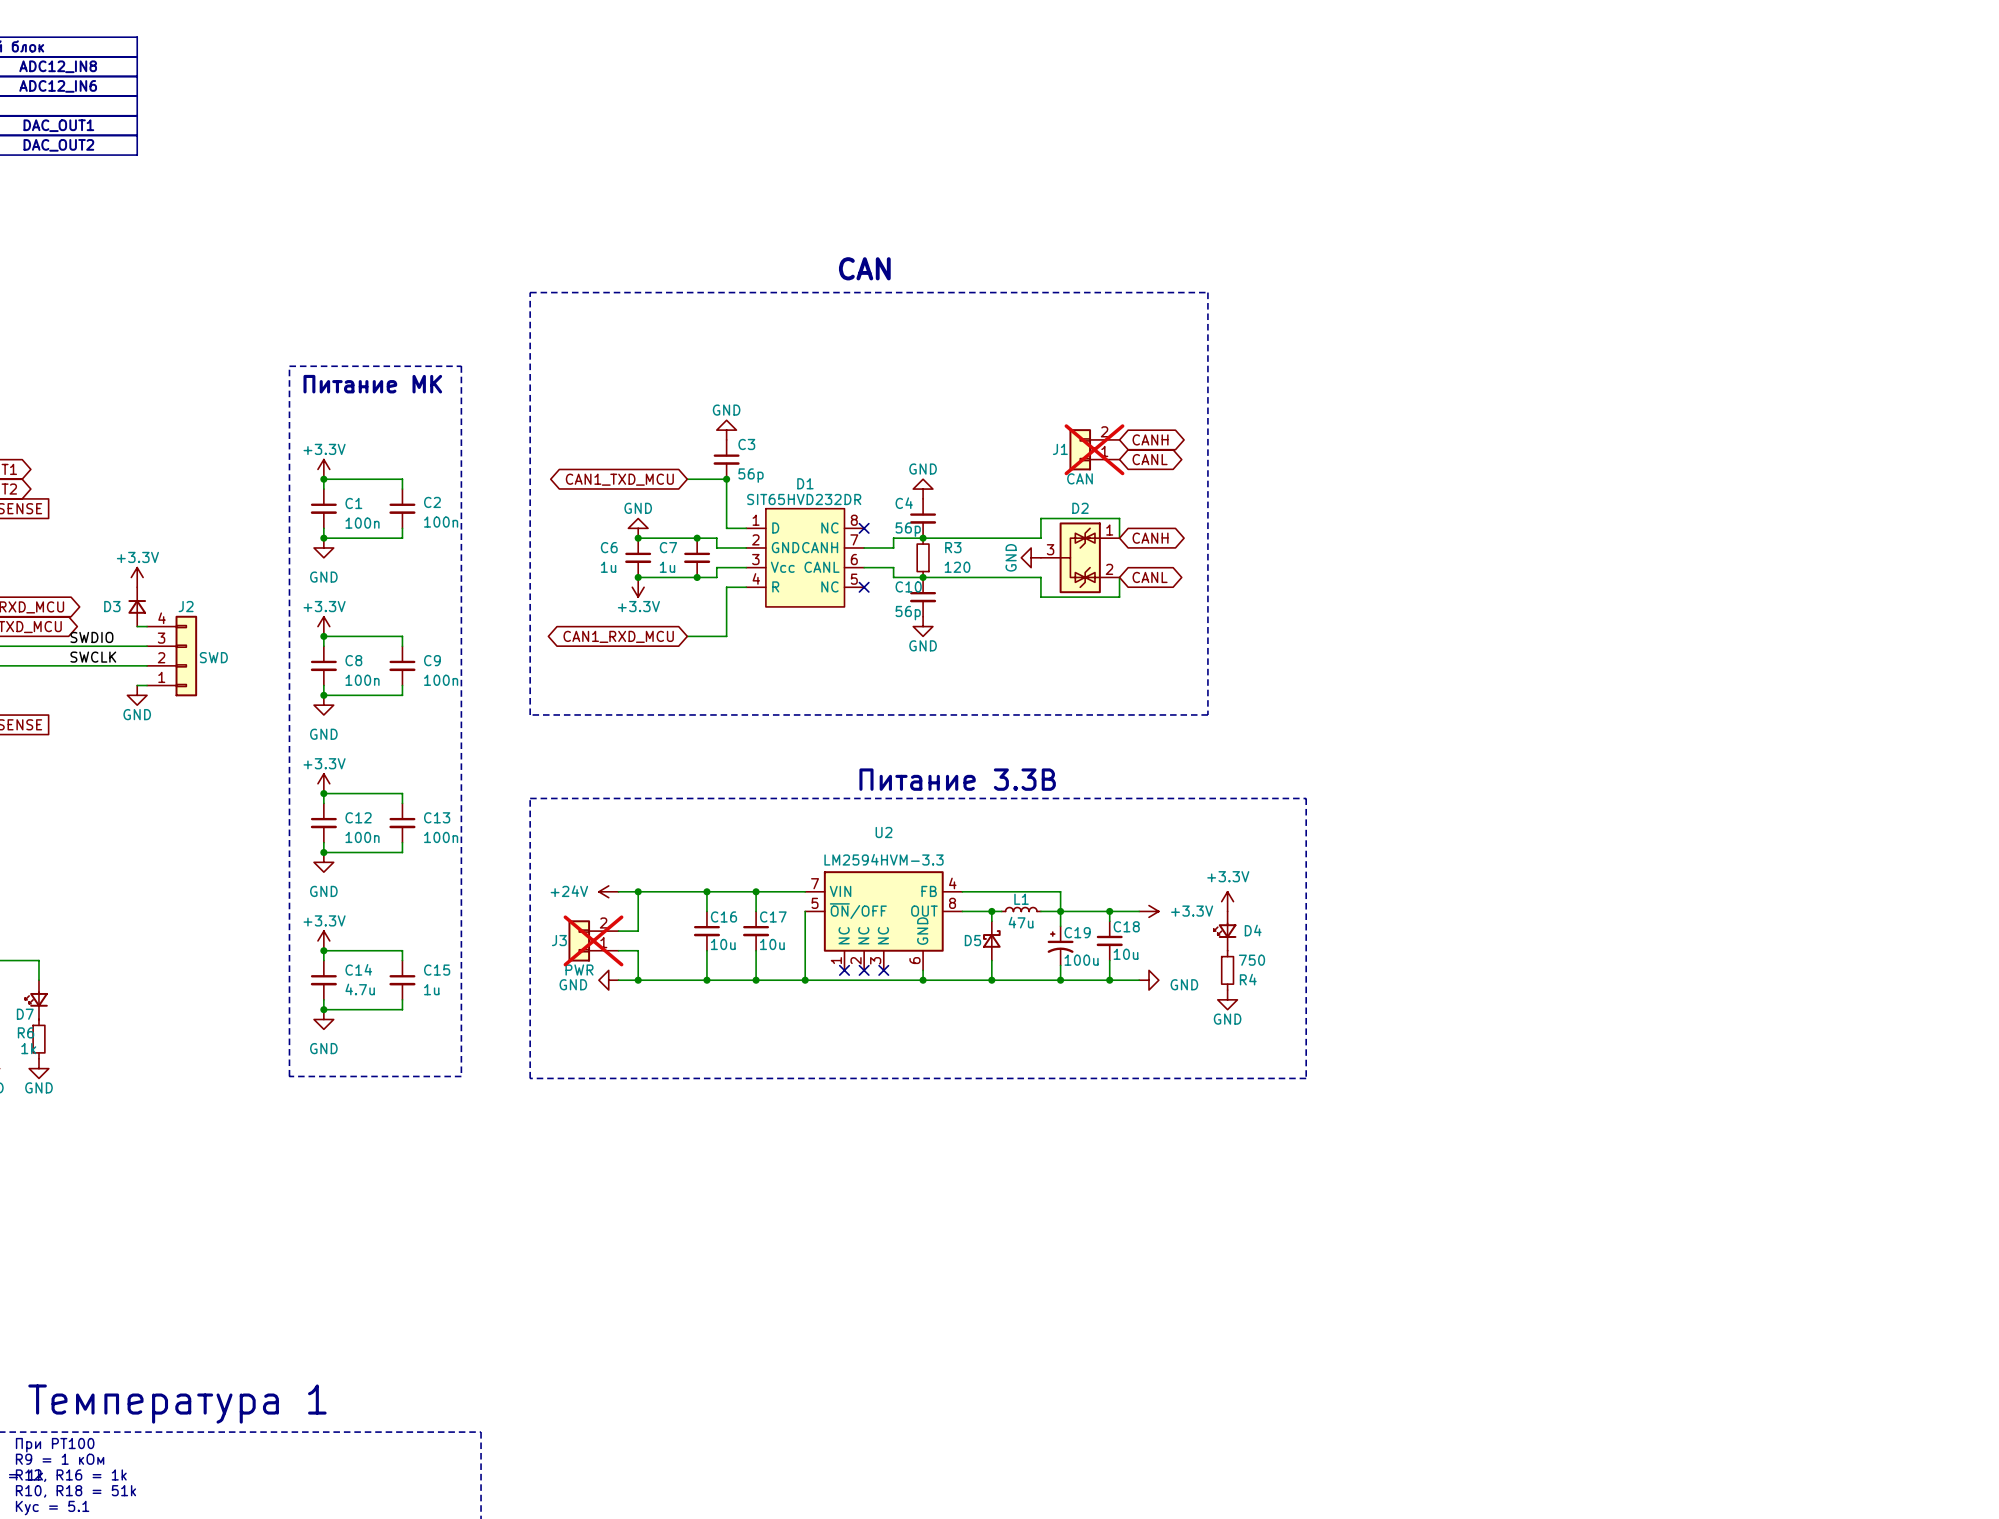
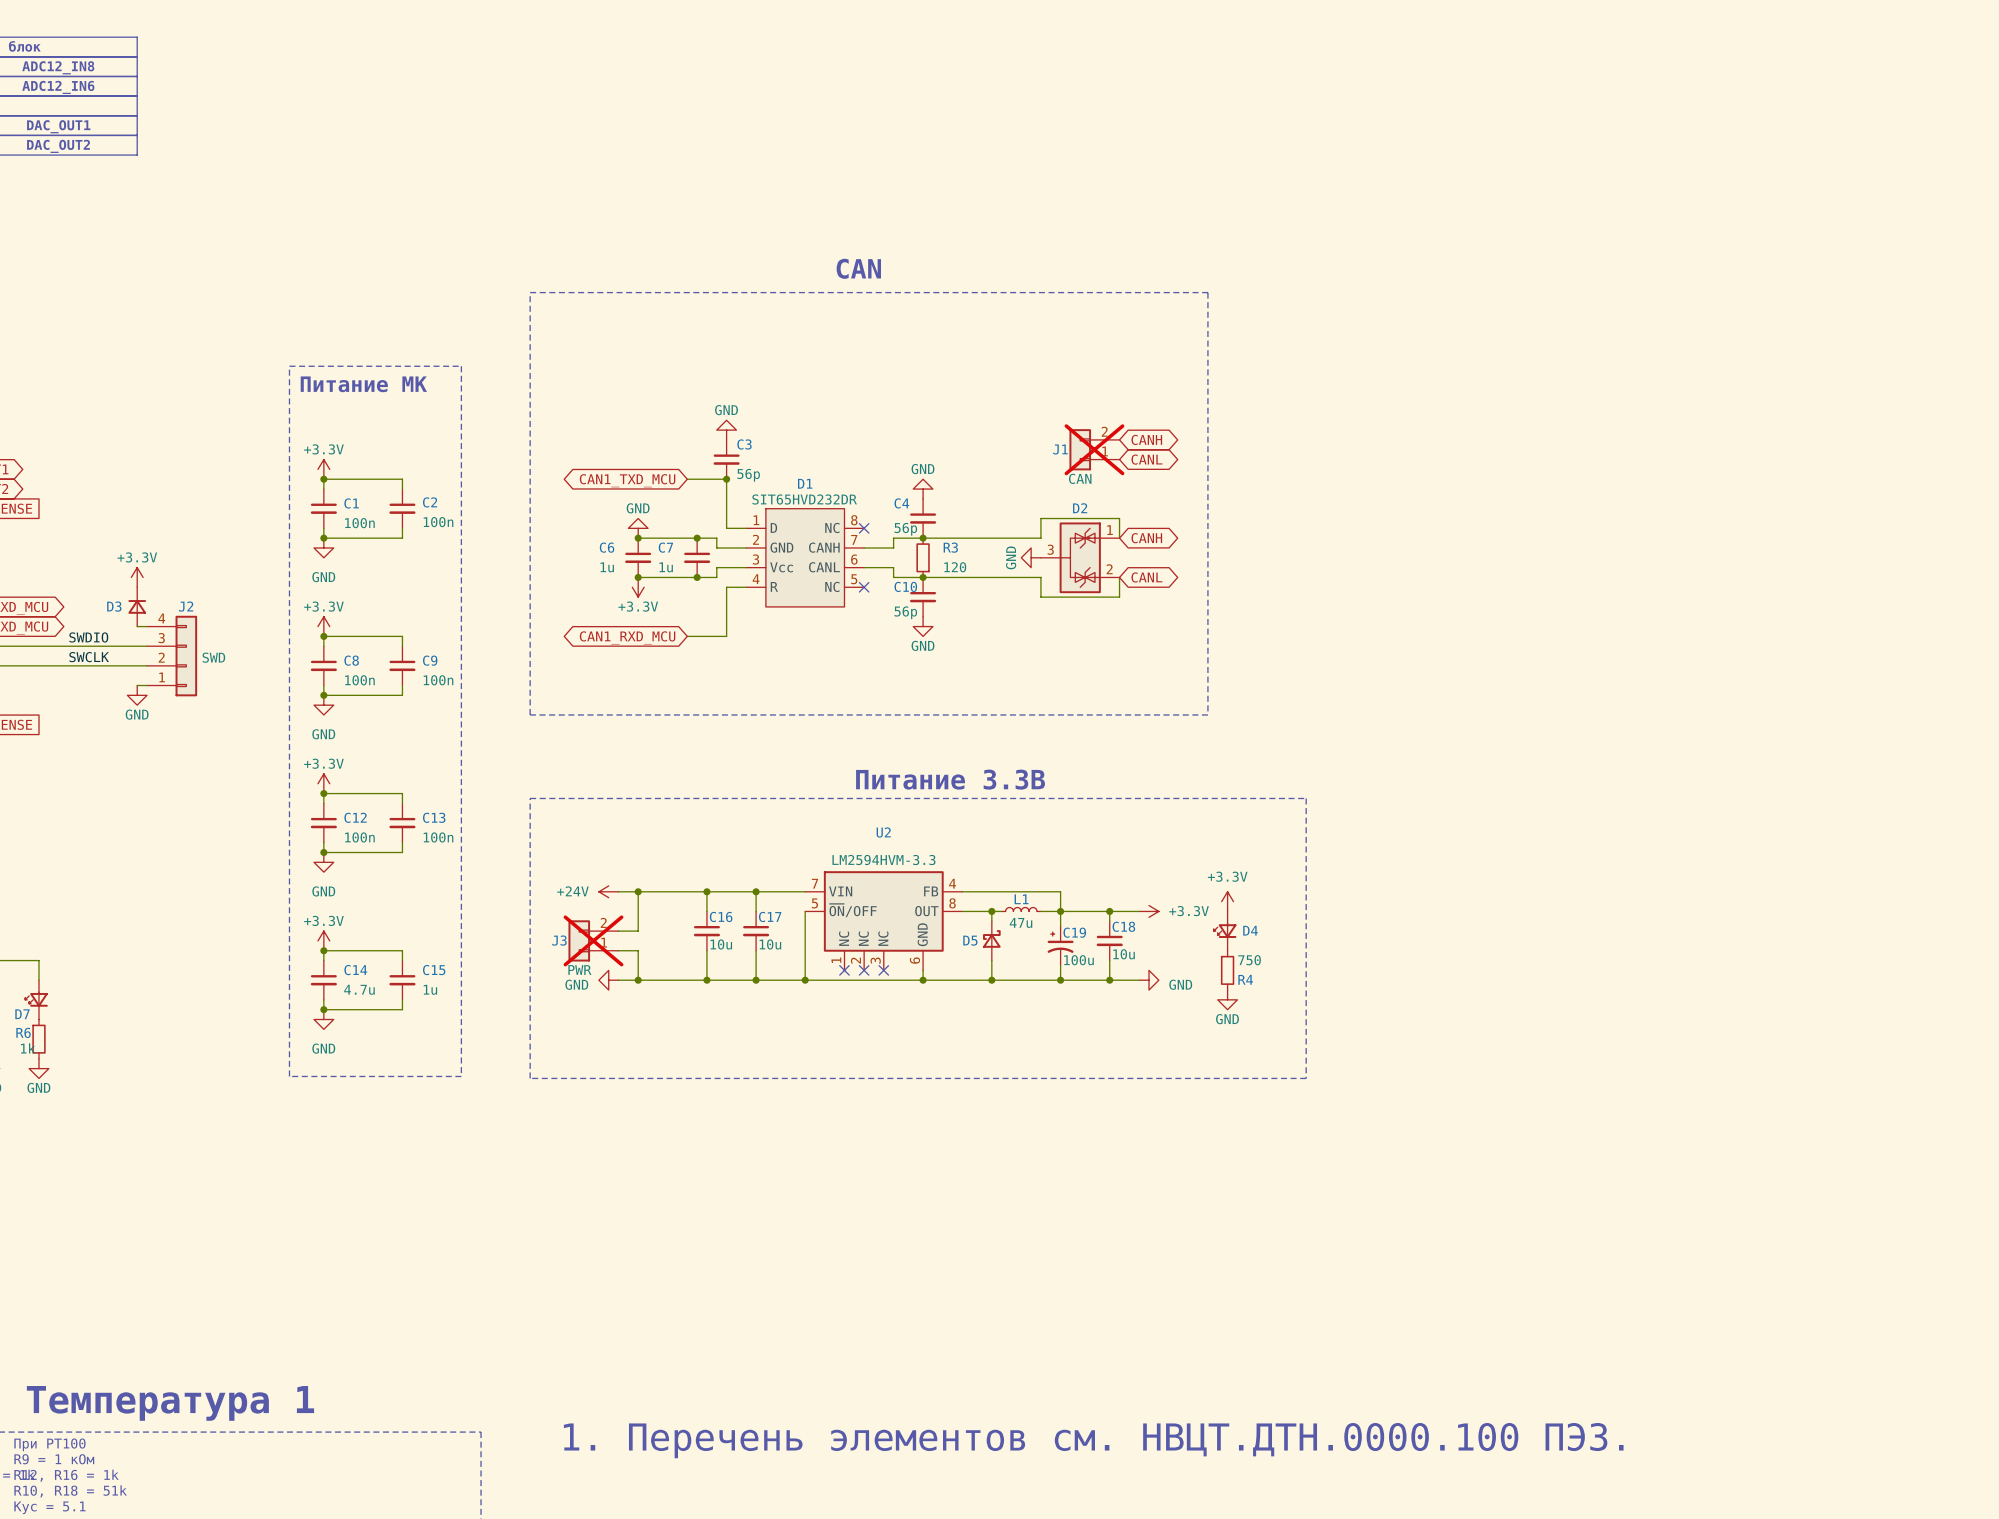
text: none -> 1. Перечень элементов см. НВЦТ.ДТН.0000.100 ПЭ3. (1093, 1440)

